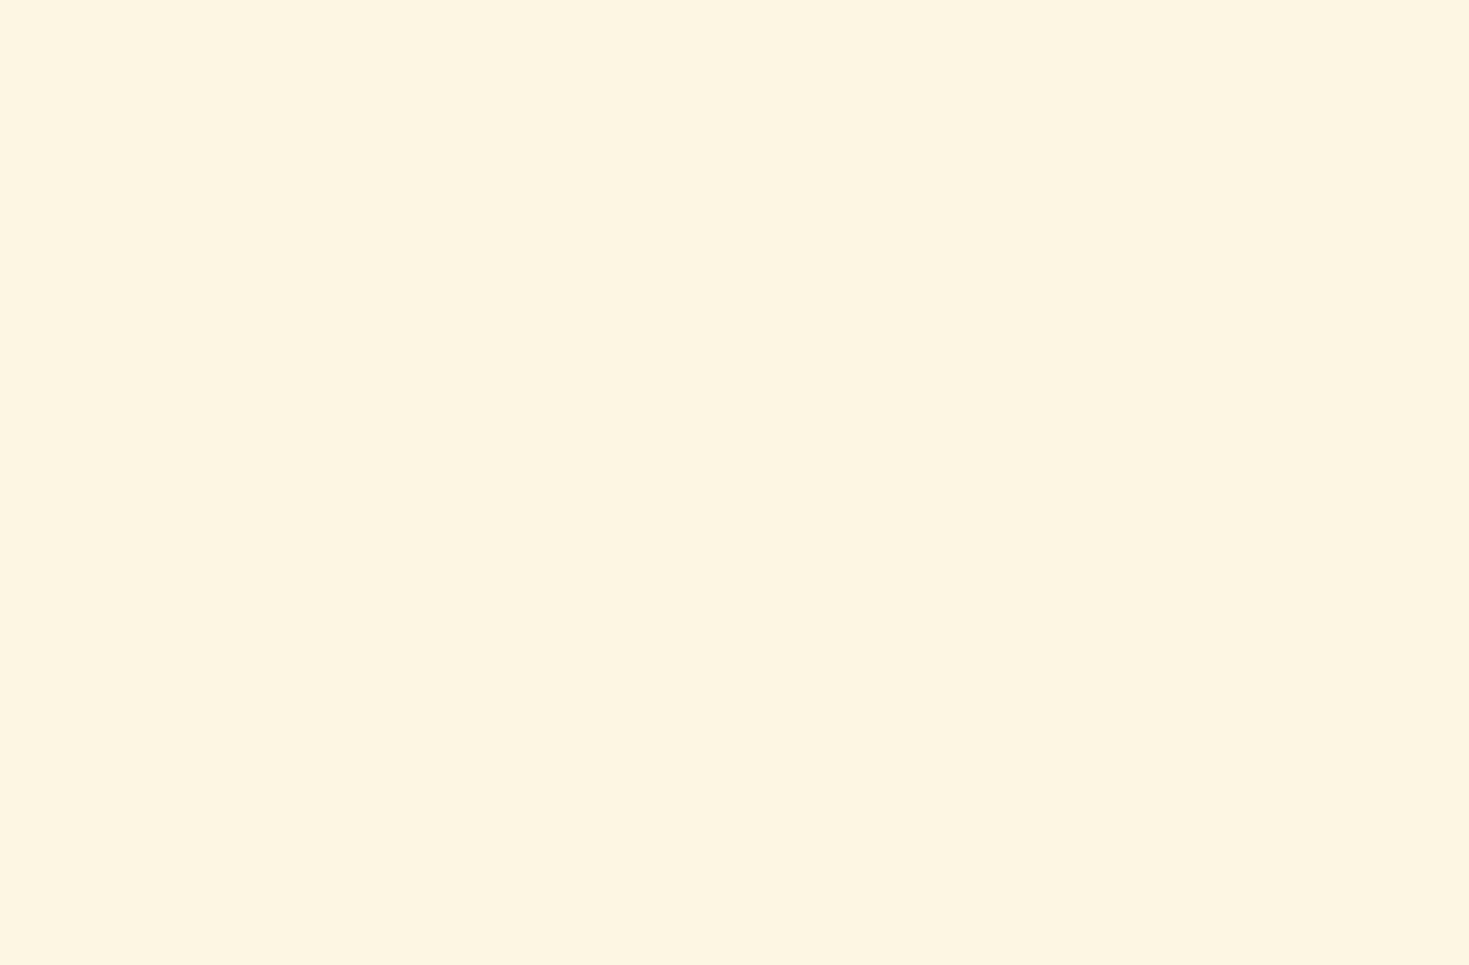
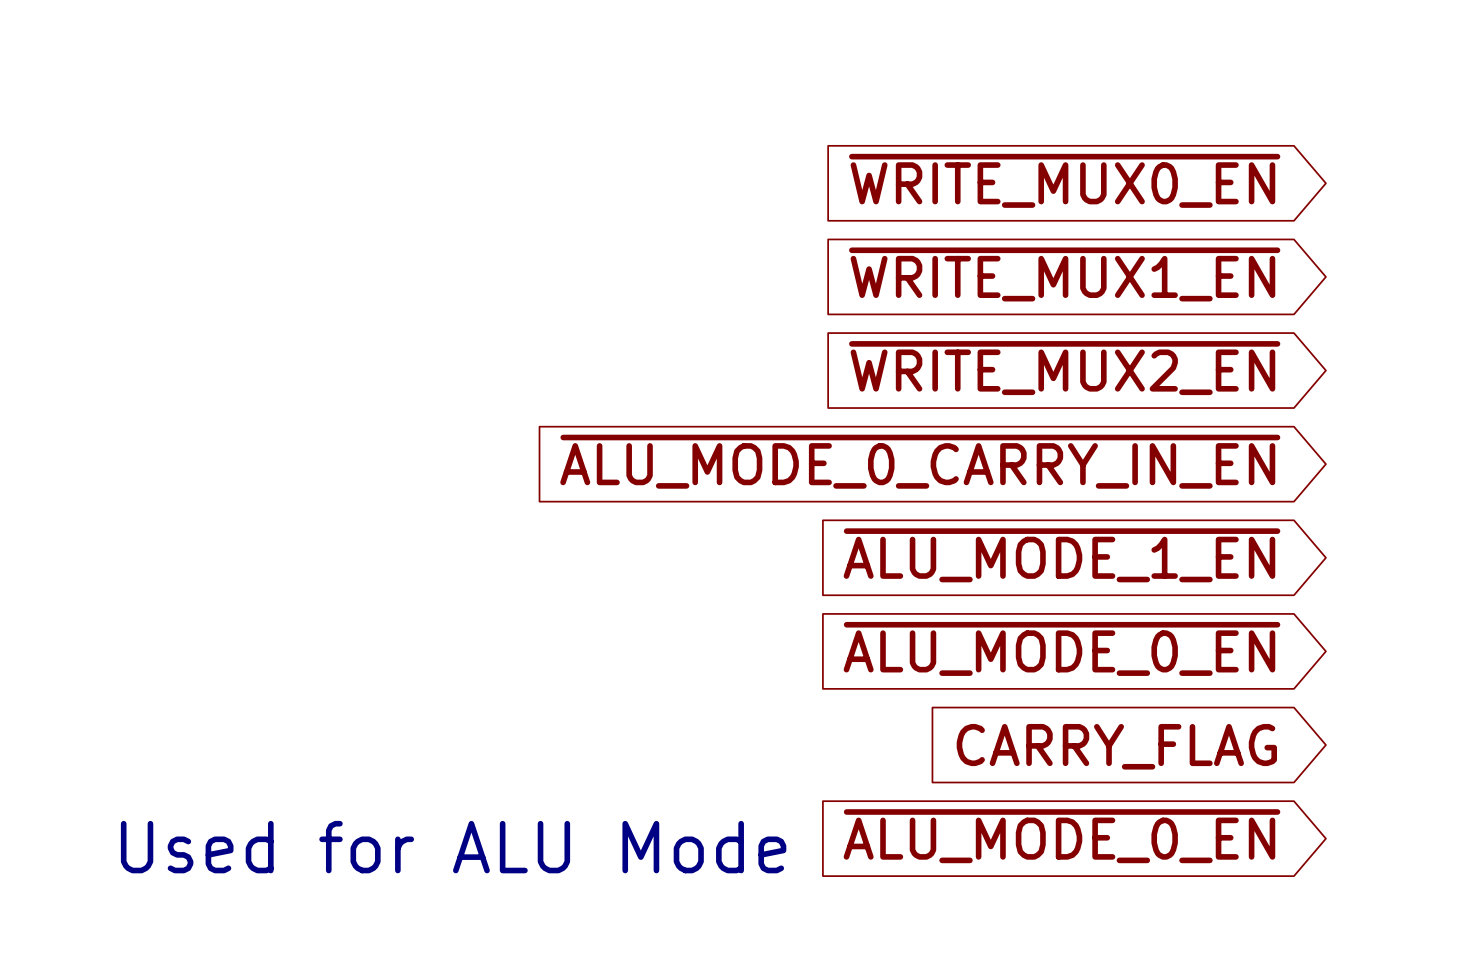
global label: none -> ~{WRITE_MUX0_EN} (1064, 180)
global label: none -> ~{WRITE_MUX1_EN} (1064, 274)
global label: none -> ~{WRITE_MUX2_EN} (1064, 368)
global label: none -> ~{ALU_MODE_0_CARRY_IN_EN} (920, 461)
global label: none -> ~{ALU_MODE_1_EN} (1061, 555)
global label: none -> ~{ALU_MODE_0_EN} (1061, 648)
global label: none -> CARRY_FLAG (1116, 746)
global label: none -> ~{ALU_MODE_0_EN} (1061, 836)
text: none -> Used for ALU Mode (453, 847)

